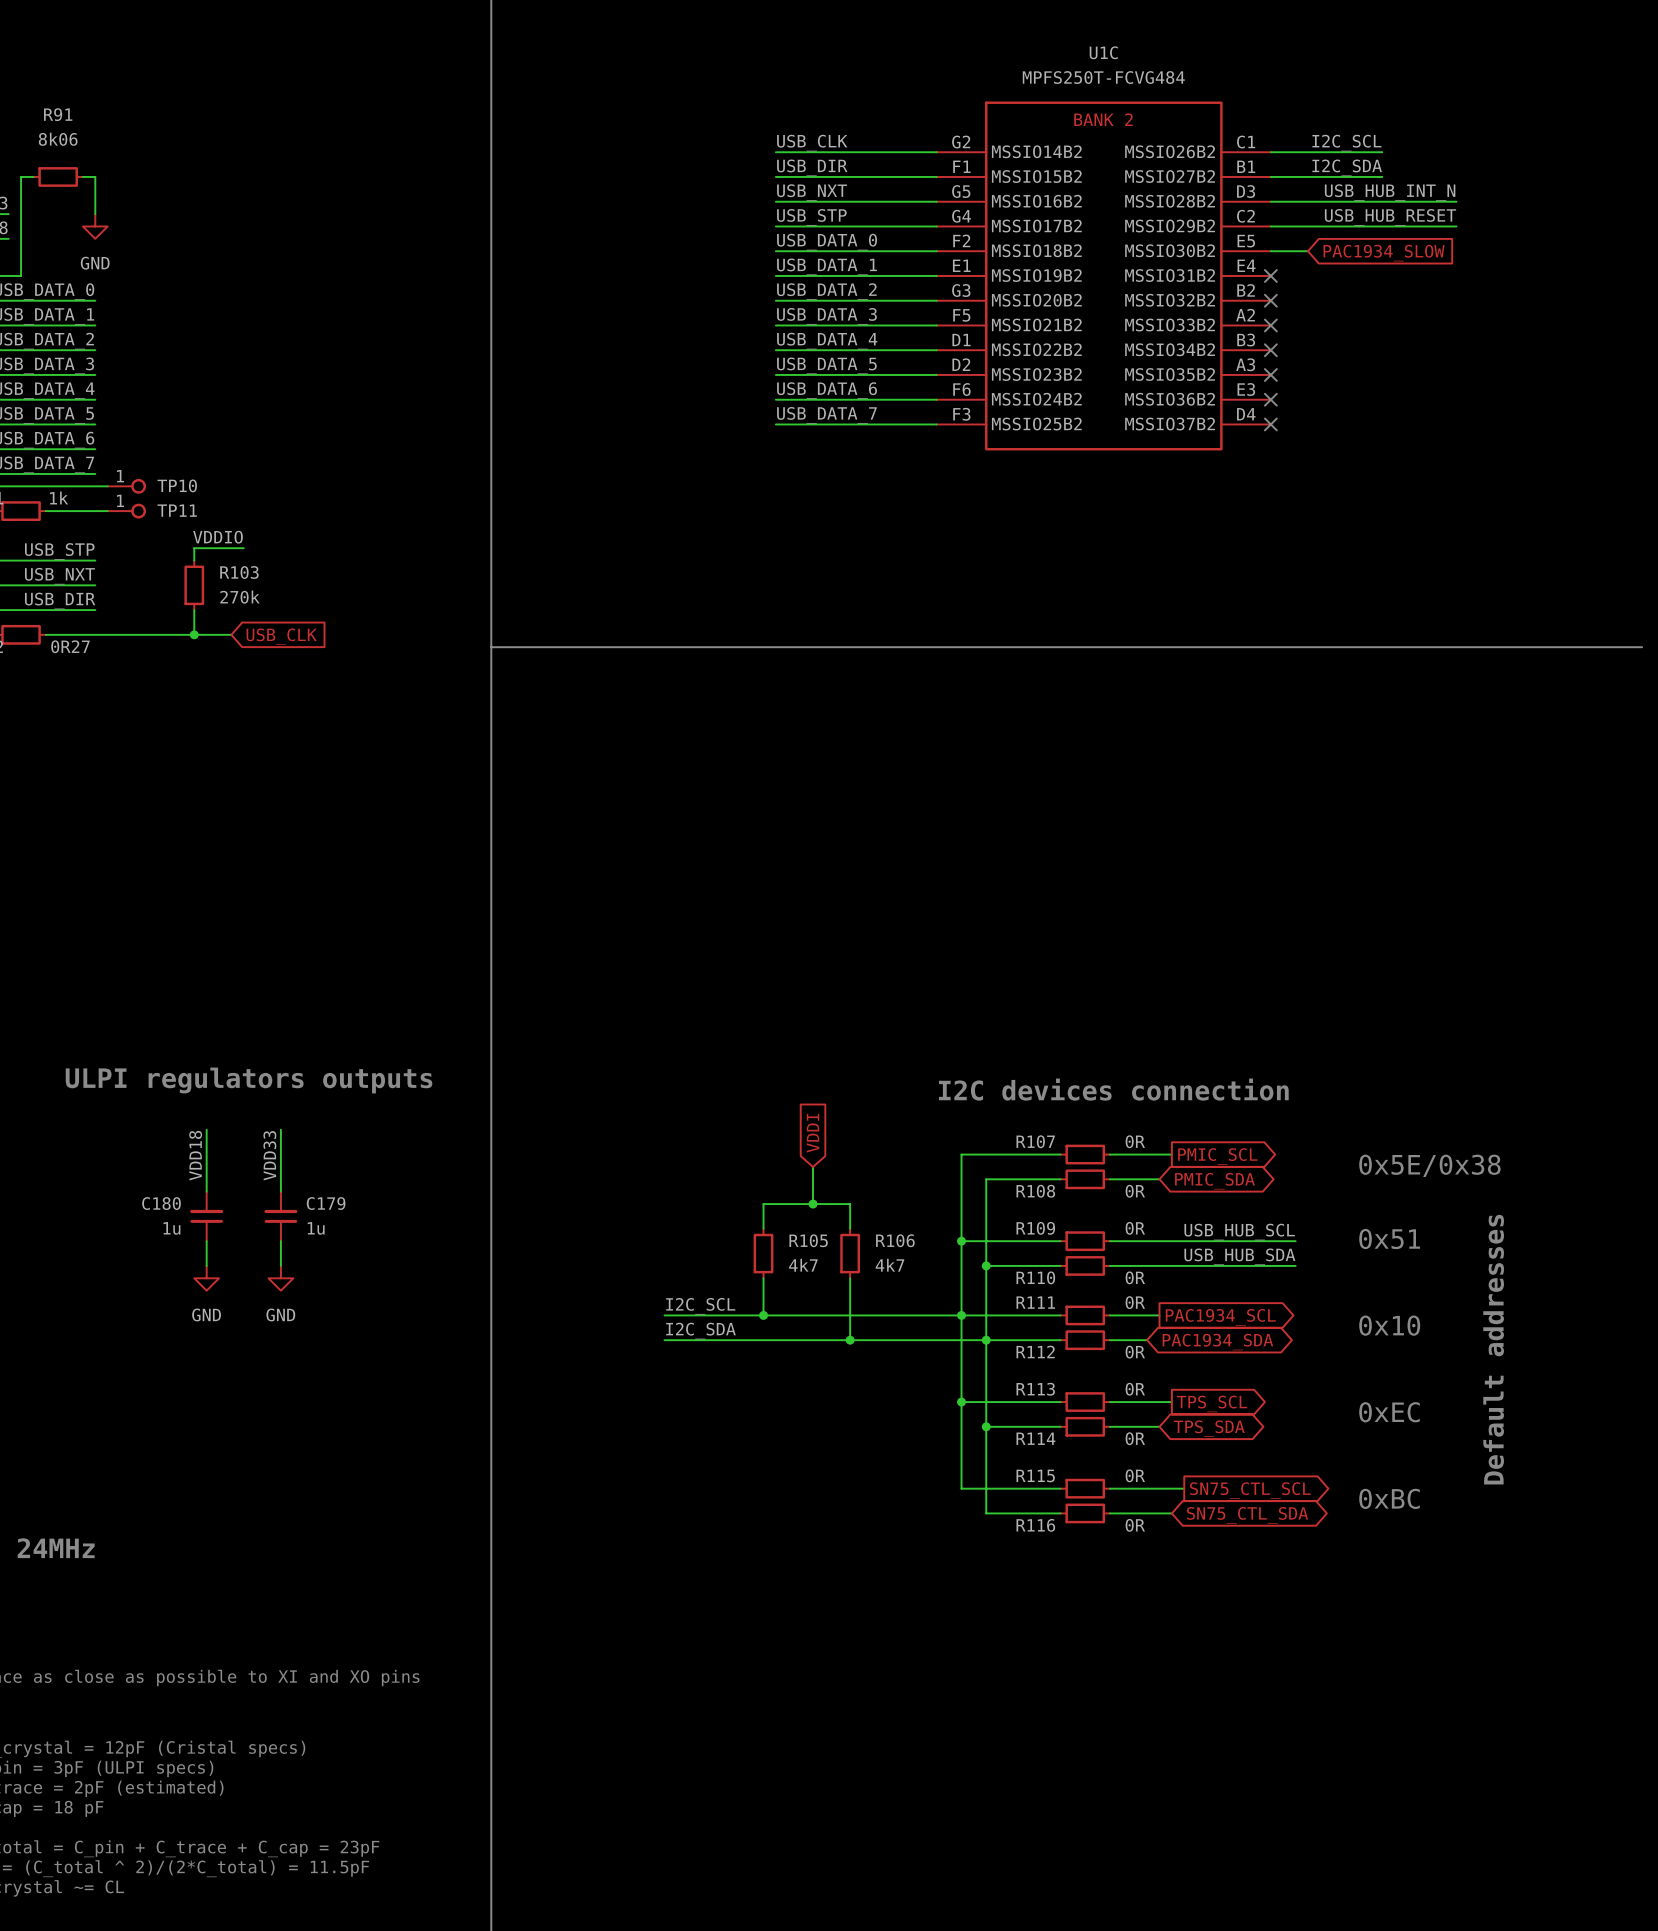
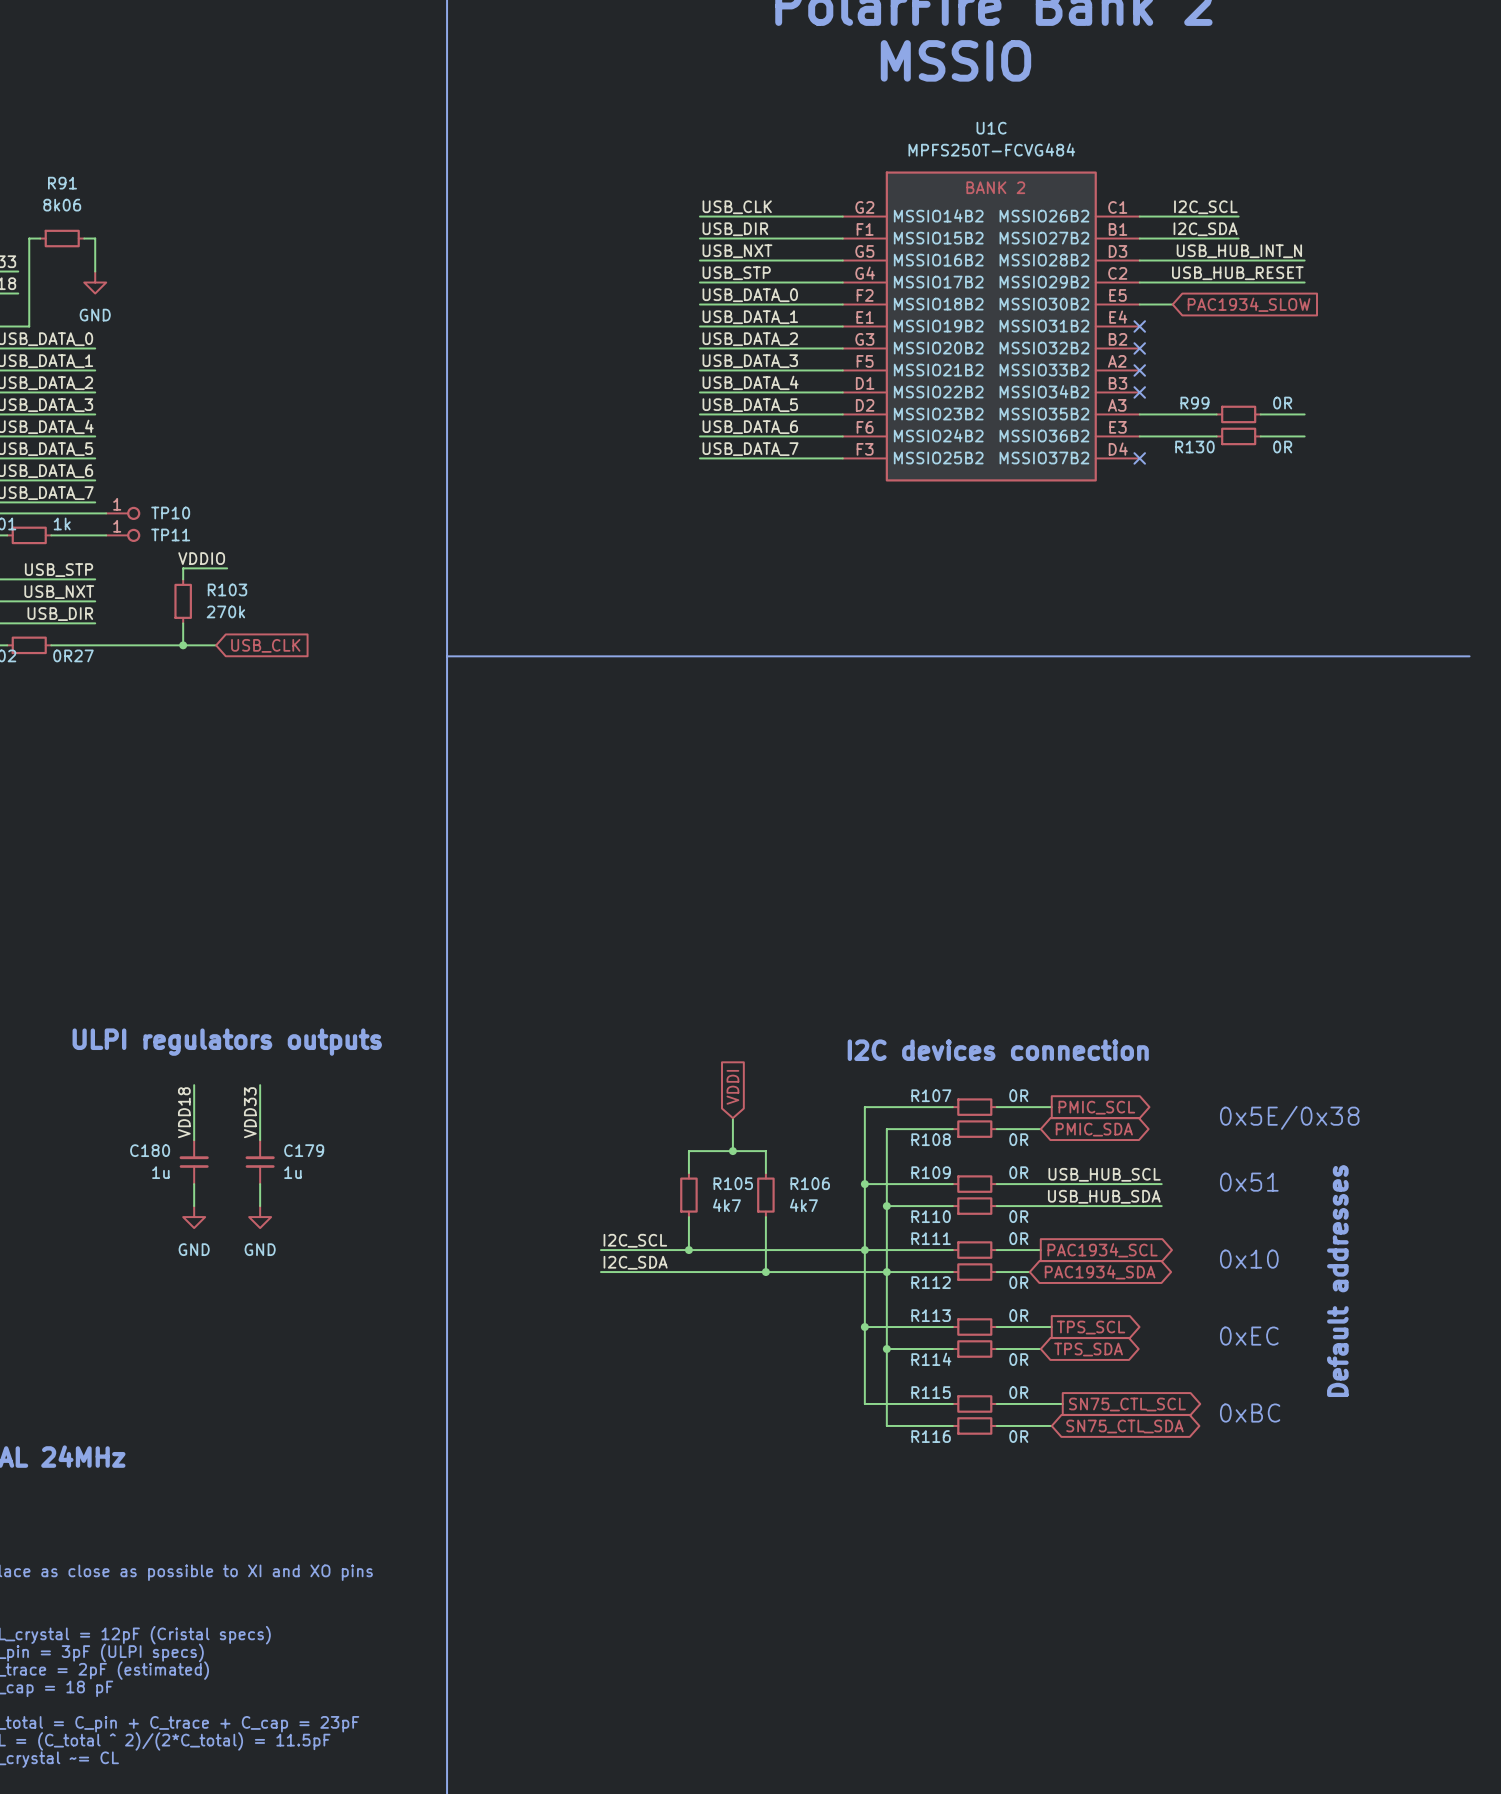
wire: none -> (1139, 414) (1216, 414)
no-connect mark: (1270, 374) -> none
R99: none -> (1238, 414)
wire: none -> (1260, 414) (1304, 414)
wire: none -> (1139, 436) (1216, 436)
no-connect mark: (1270, 399) -> none
R130: none -> (1238, 436)
wire: none -> (1260, 436) (1304, 436)

